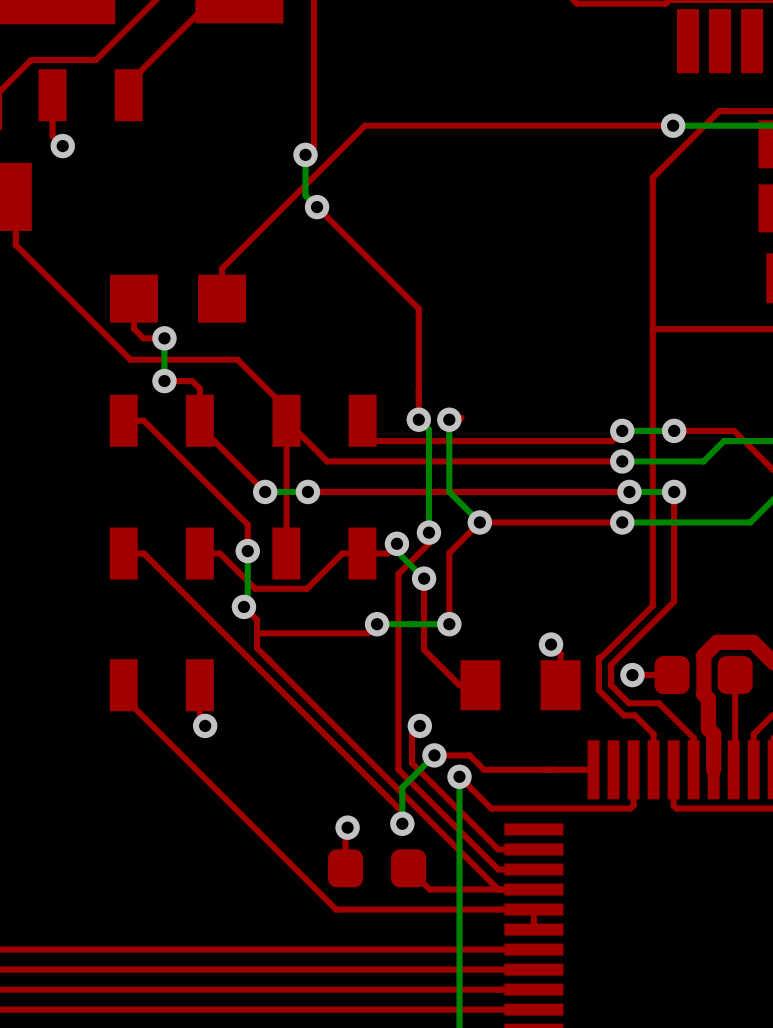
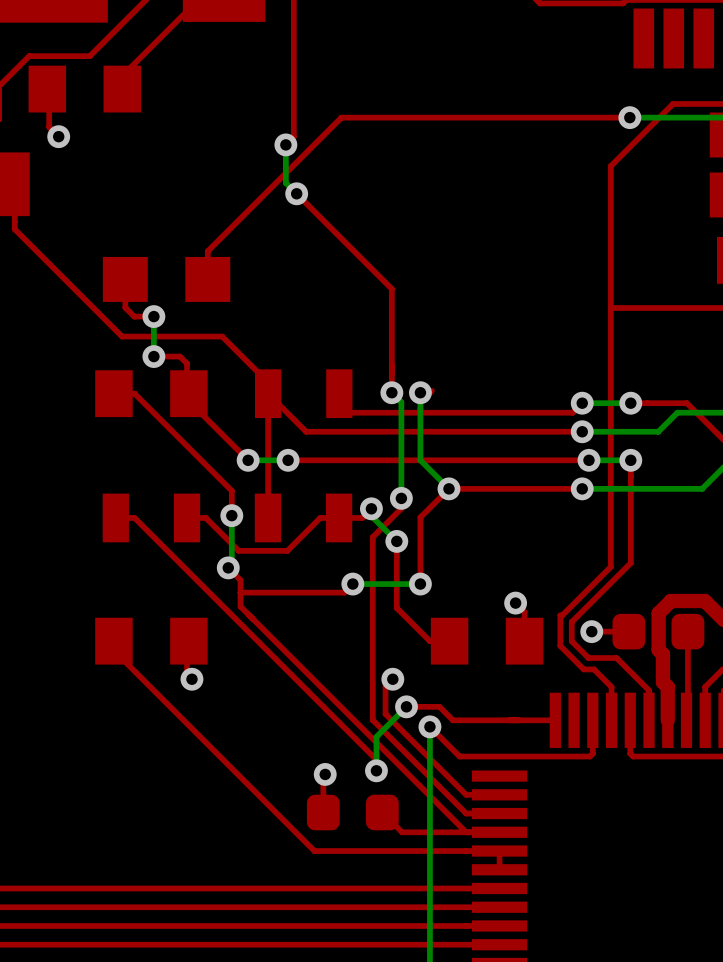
part footprint: [38, 69, 143, 122] -> [28, 65, 142, 113]
part footprint: [109, 394, 214, 447] -> [95, 370, 208, 418]
part footprint: [109, 659, 214, 712] -> [95, 617, 208, 665]

